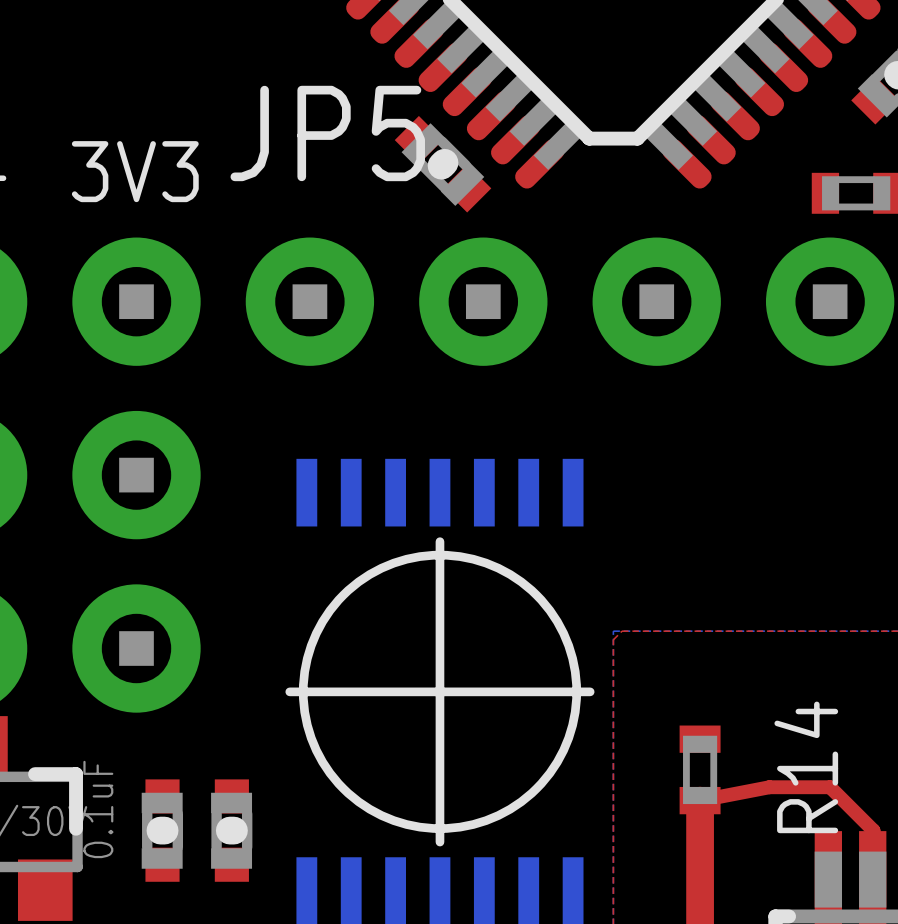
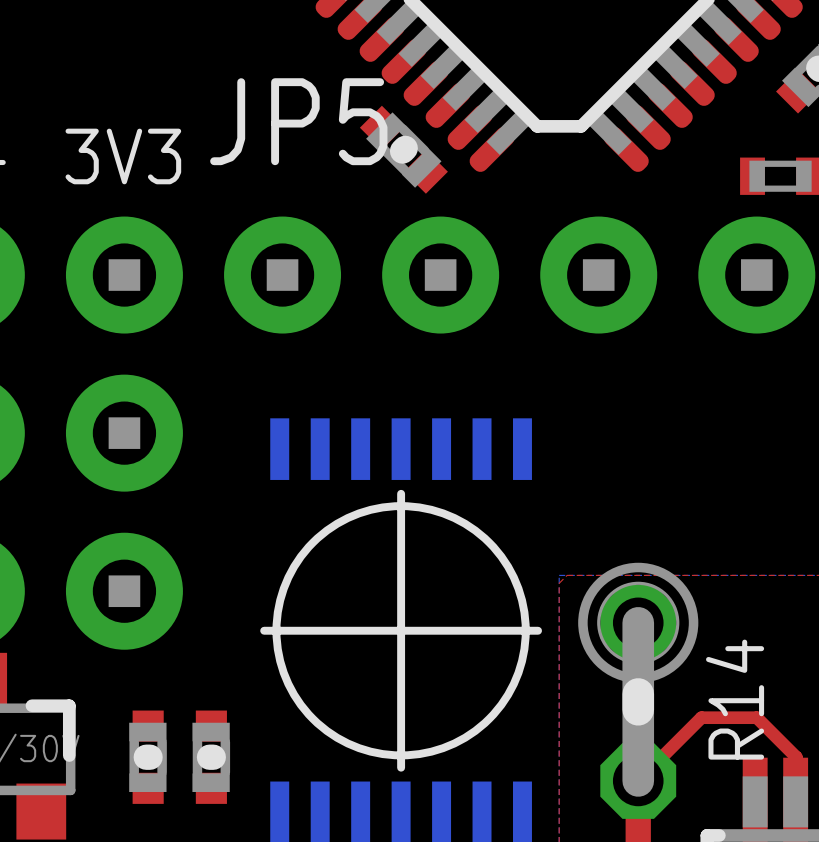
R14 footprint: [679, 725, 721, 815] -> [578, 562, 699, 819]
top track: (769, 787) (700, 800) (700, 856) -> (701, 717) (638, 780)
part value: 0.1uF (98, 809) -> none

